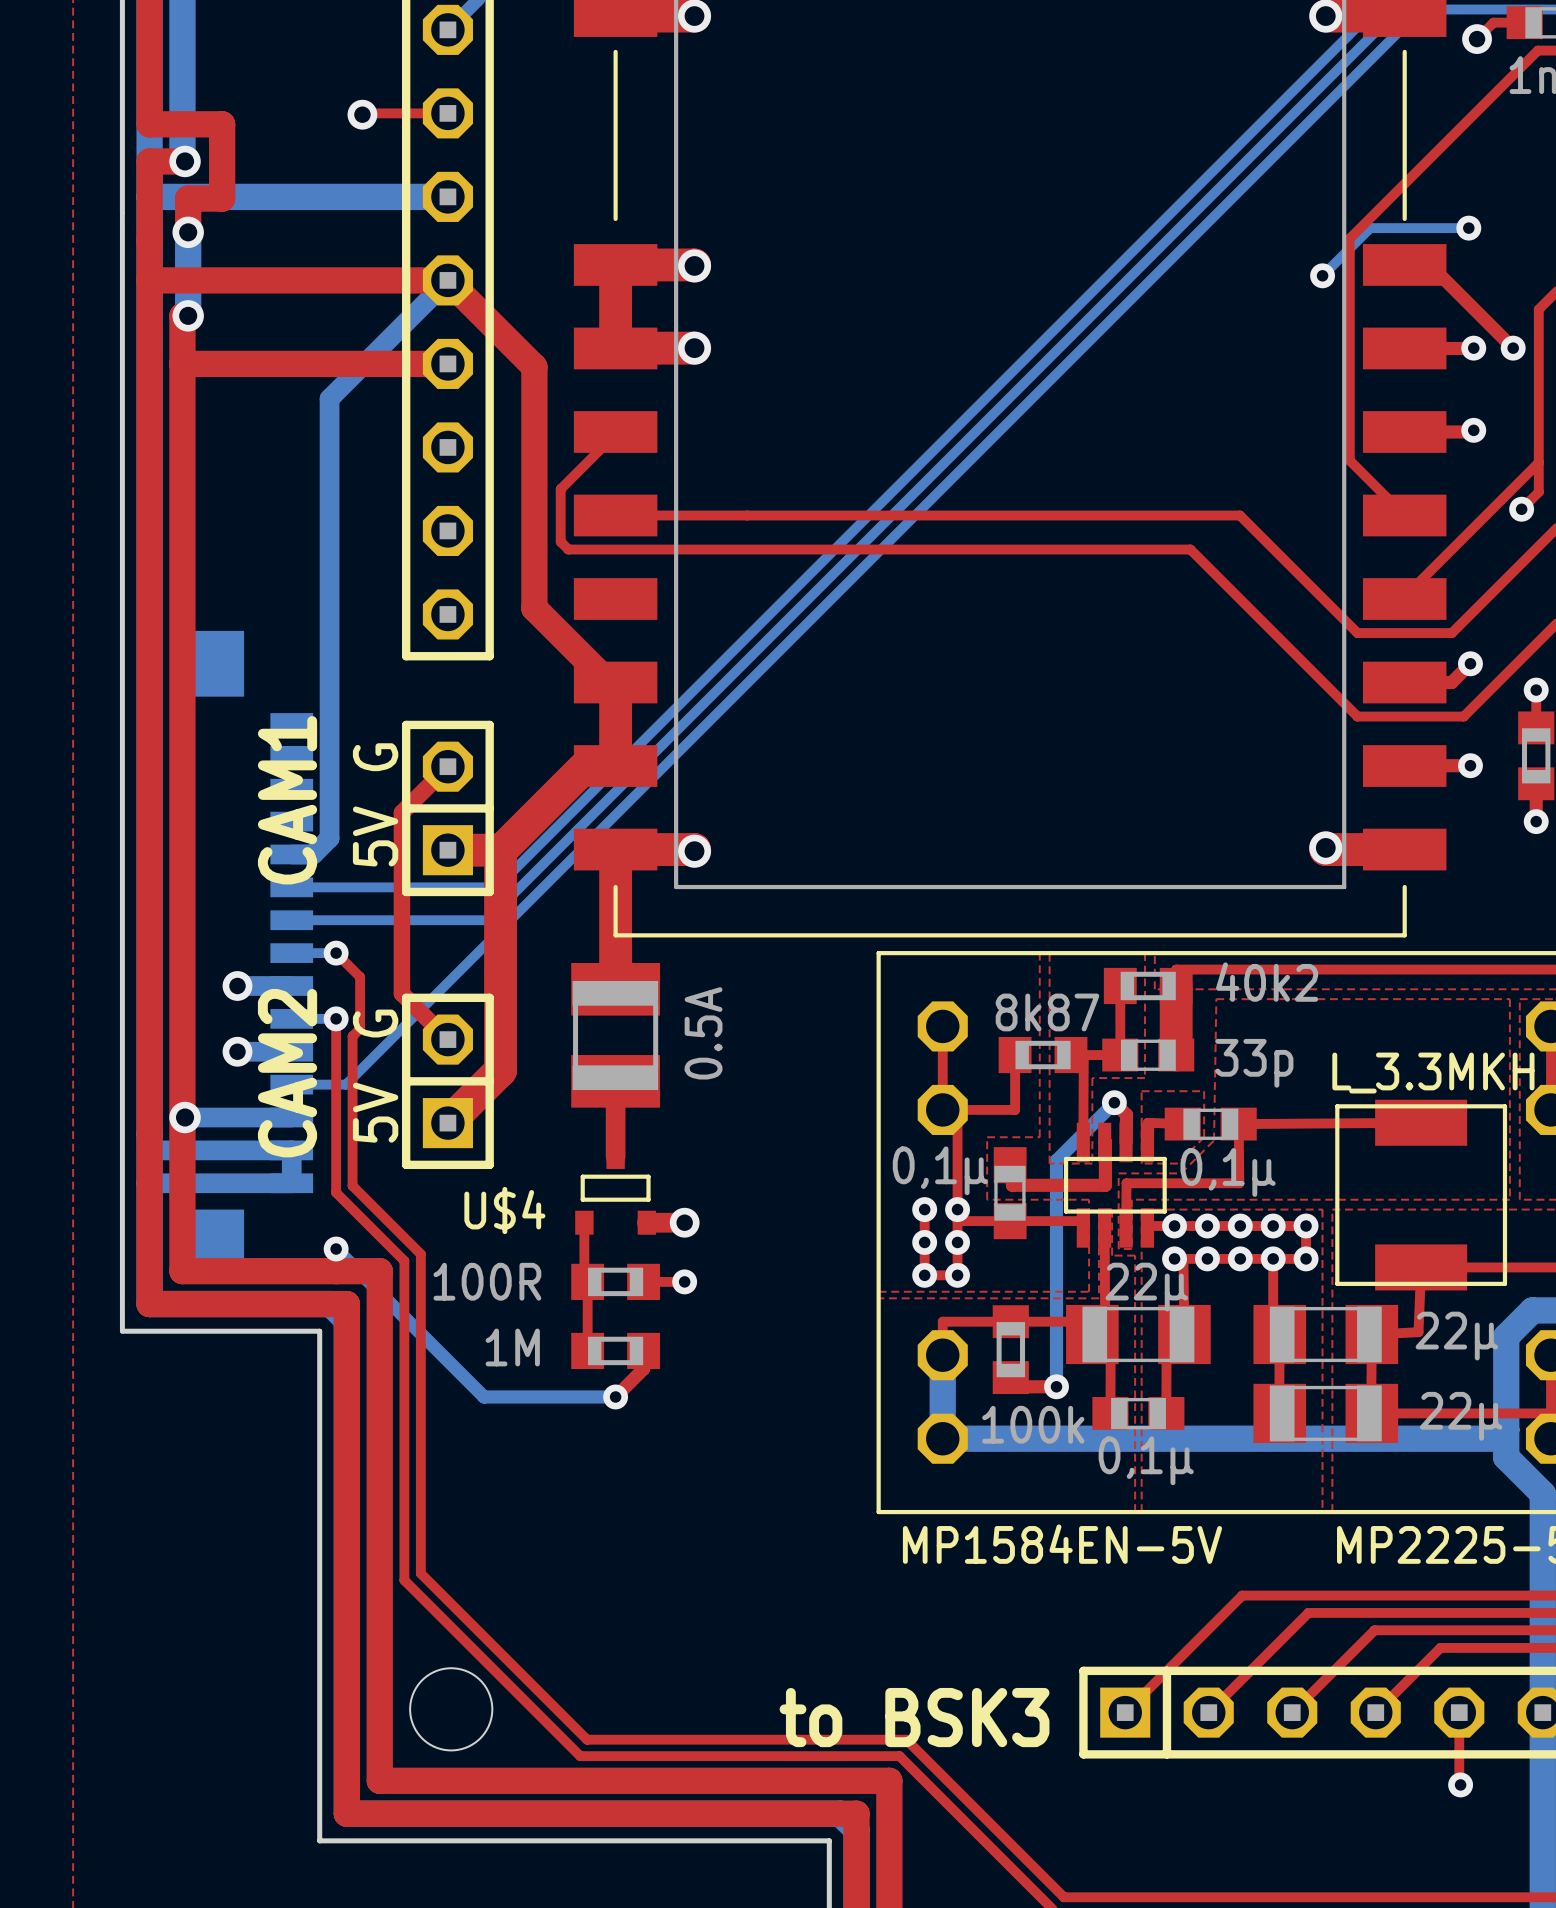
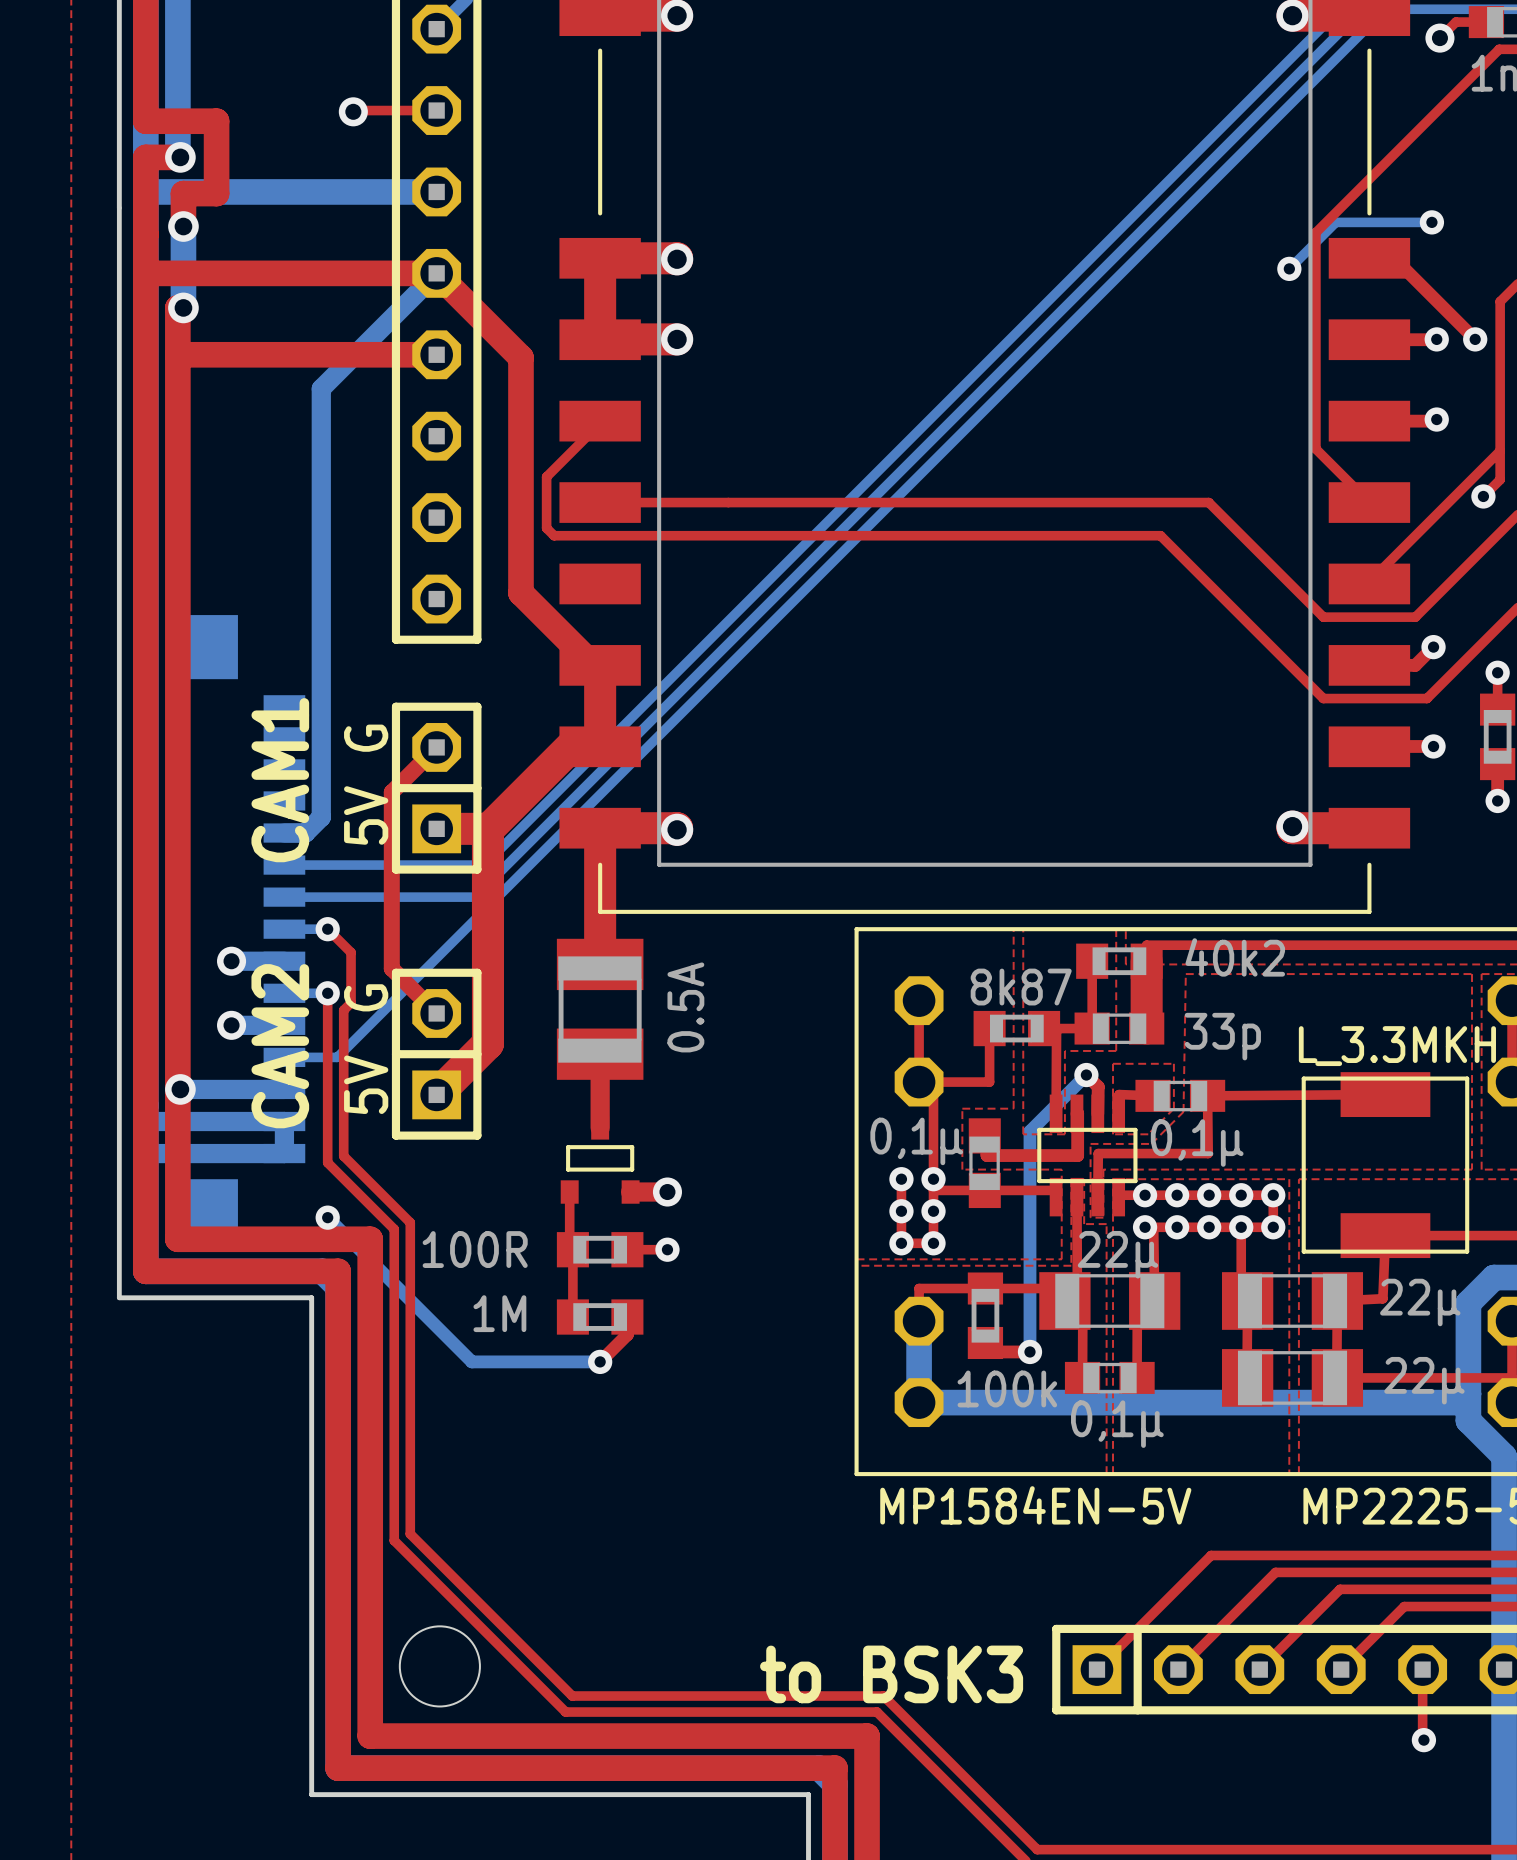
U$4 name: U$4 (504, 1210) -> none

